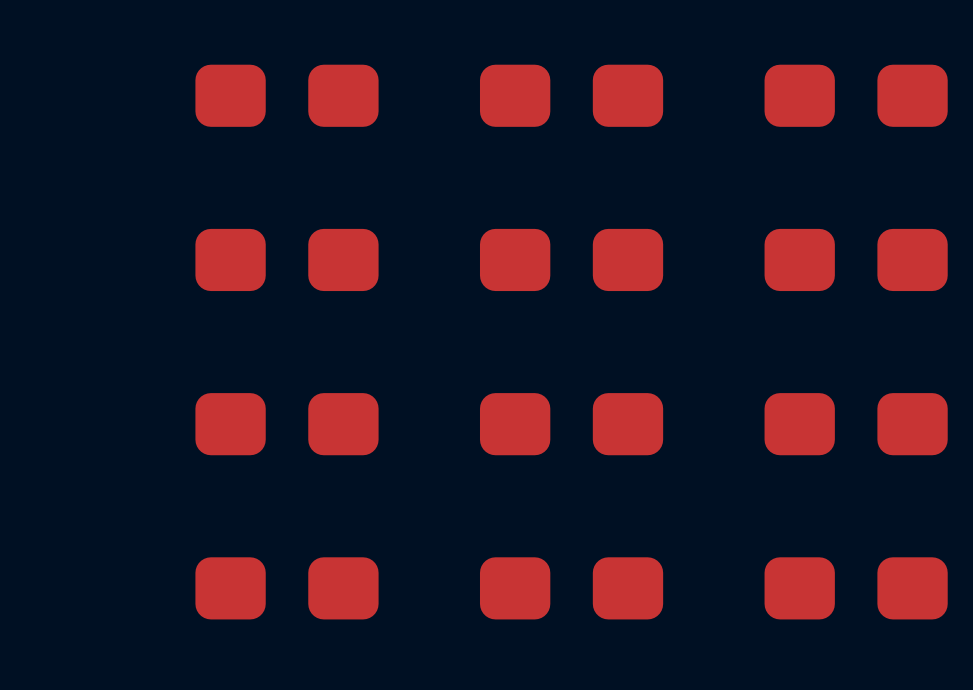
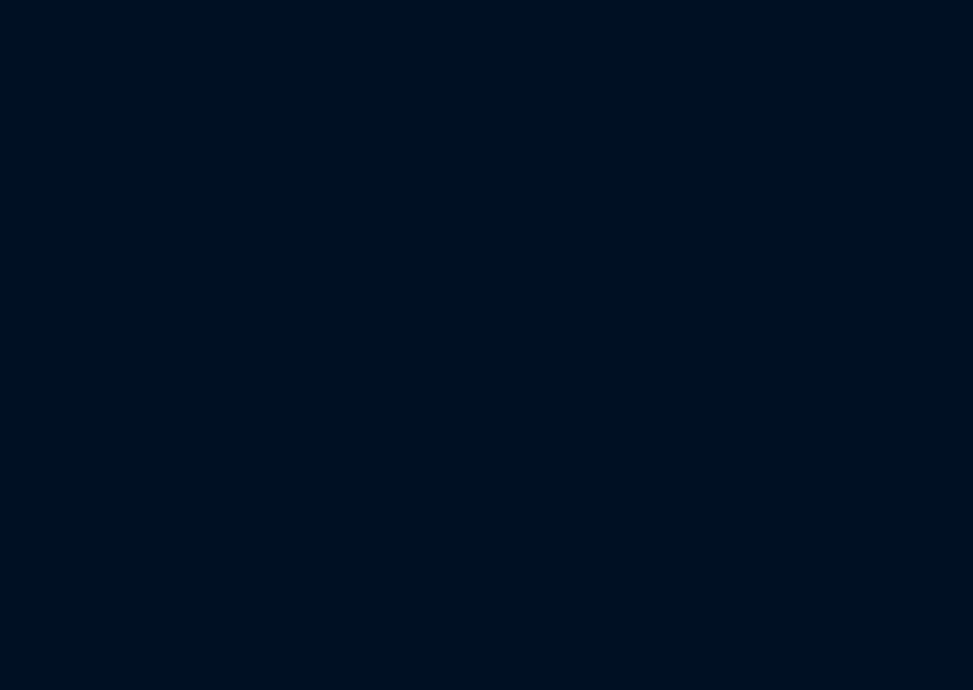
part: (287, 95) -> none
part: (571, 95) -> none
part: (856, 95) -> none
part: (287, 259) -> none
part: (571, 259) -> none
part: (856, 259) -> none
part: (287, 424) -> none
part: (571, 424) -> none
part: (856, 424) -> none
part: (287, 588) -> none
part: (571, 588) -> none
part: (856, 588) -> none

